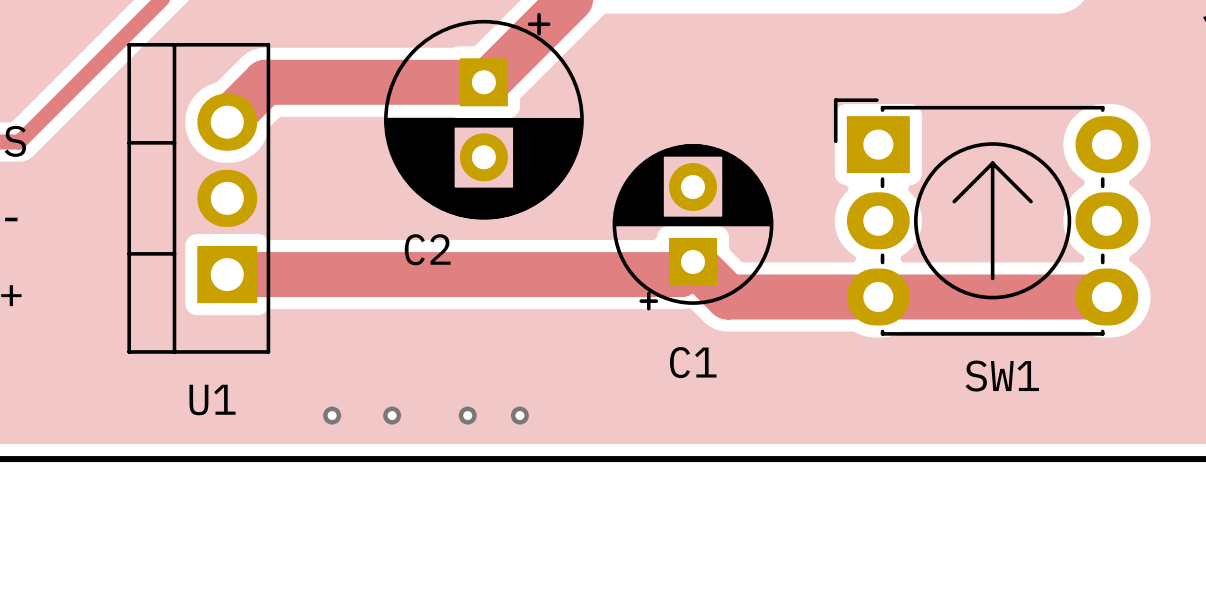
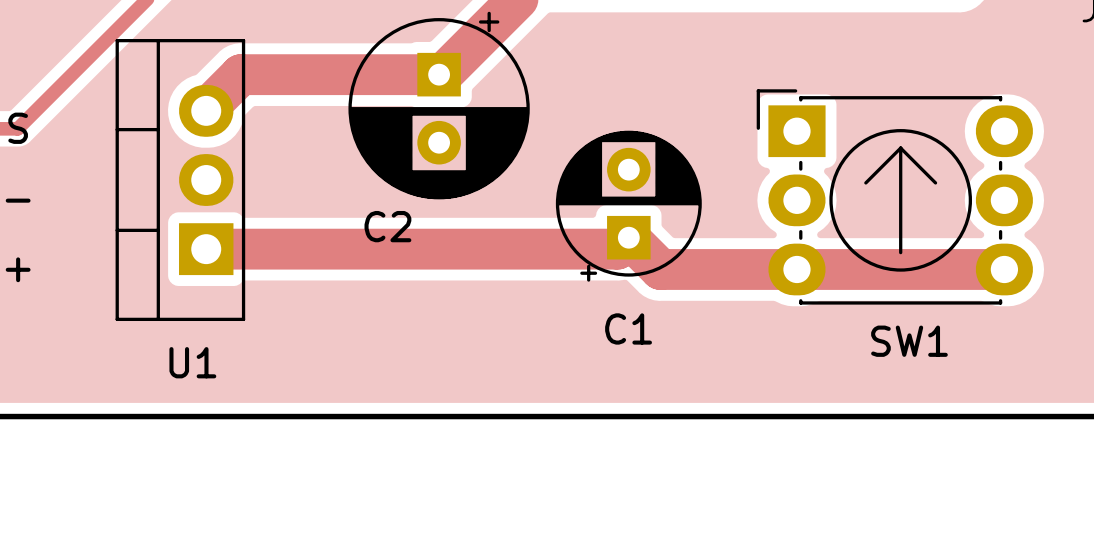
via: (332, 415) -> none
via: (392, 415) -> none
via: (467, 415) -> none
via: (519, 415) -> none

